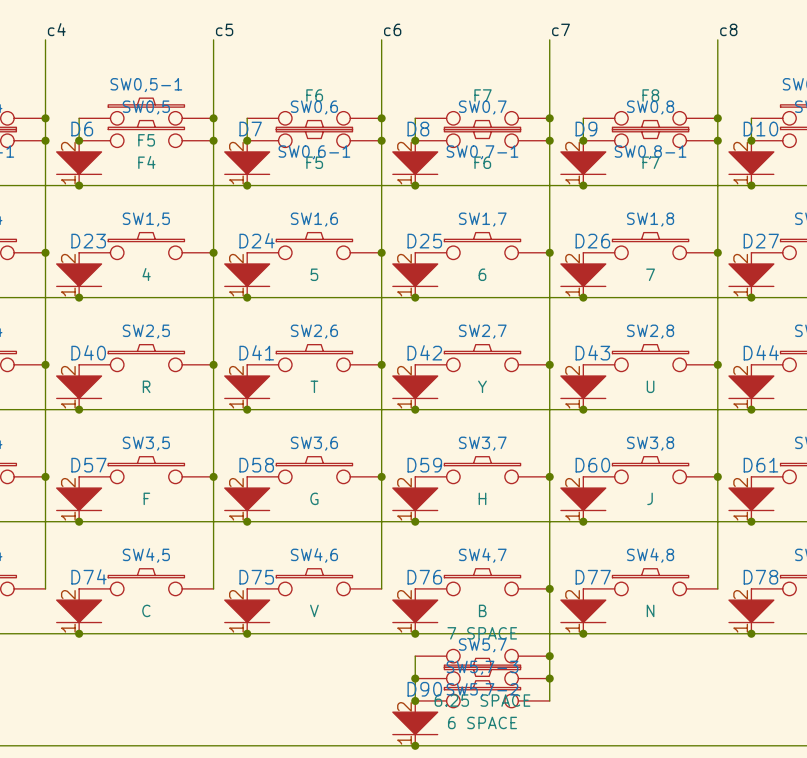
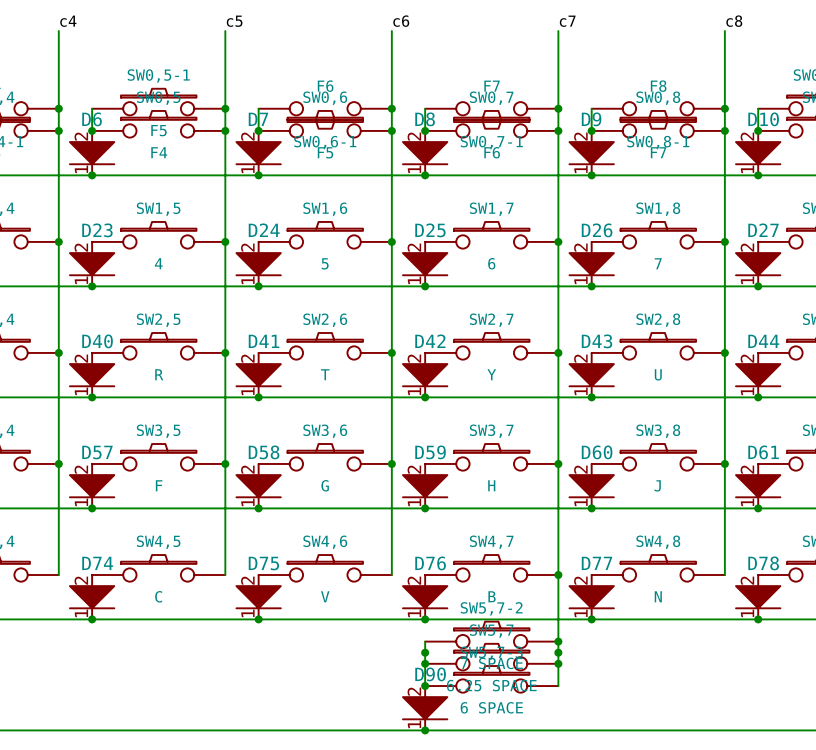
junction: none -> (425, 652)
junction: none -> (558, 652)
SW5,7-2 rotation: 0° (482, 671) -> 180° (491, 626)

